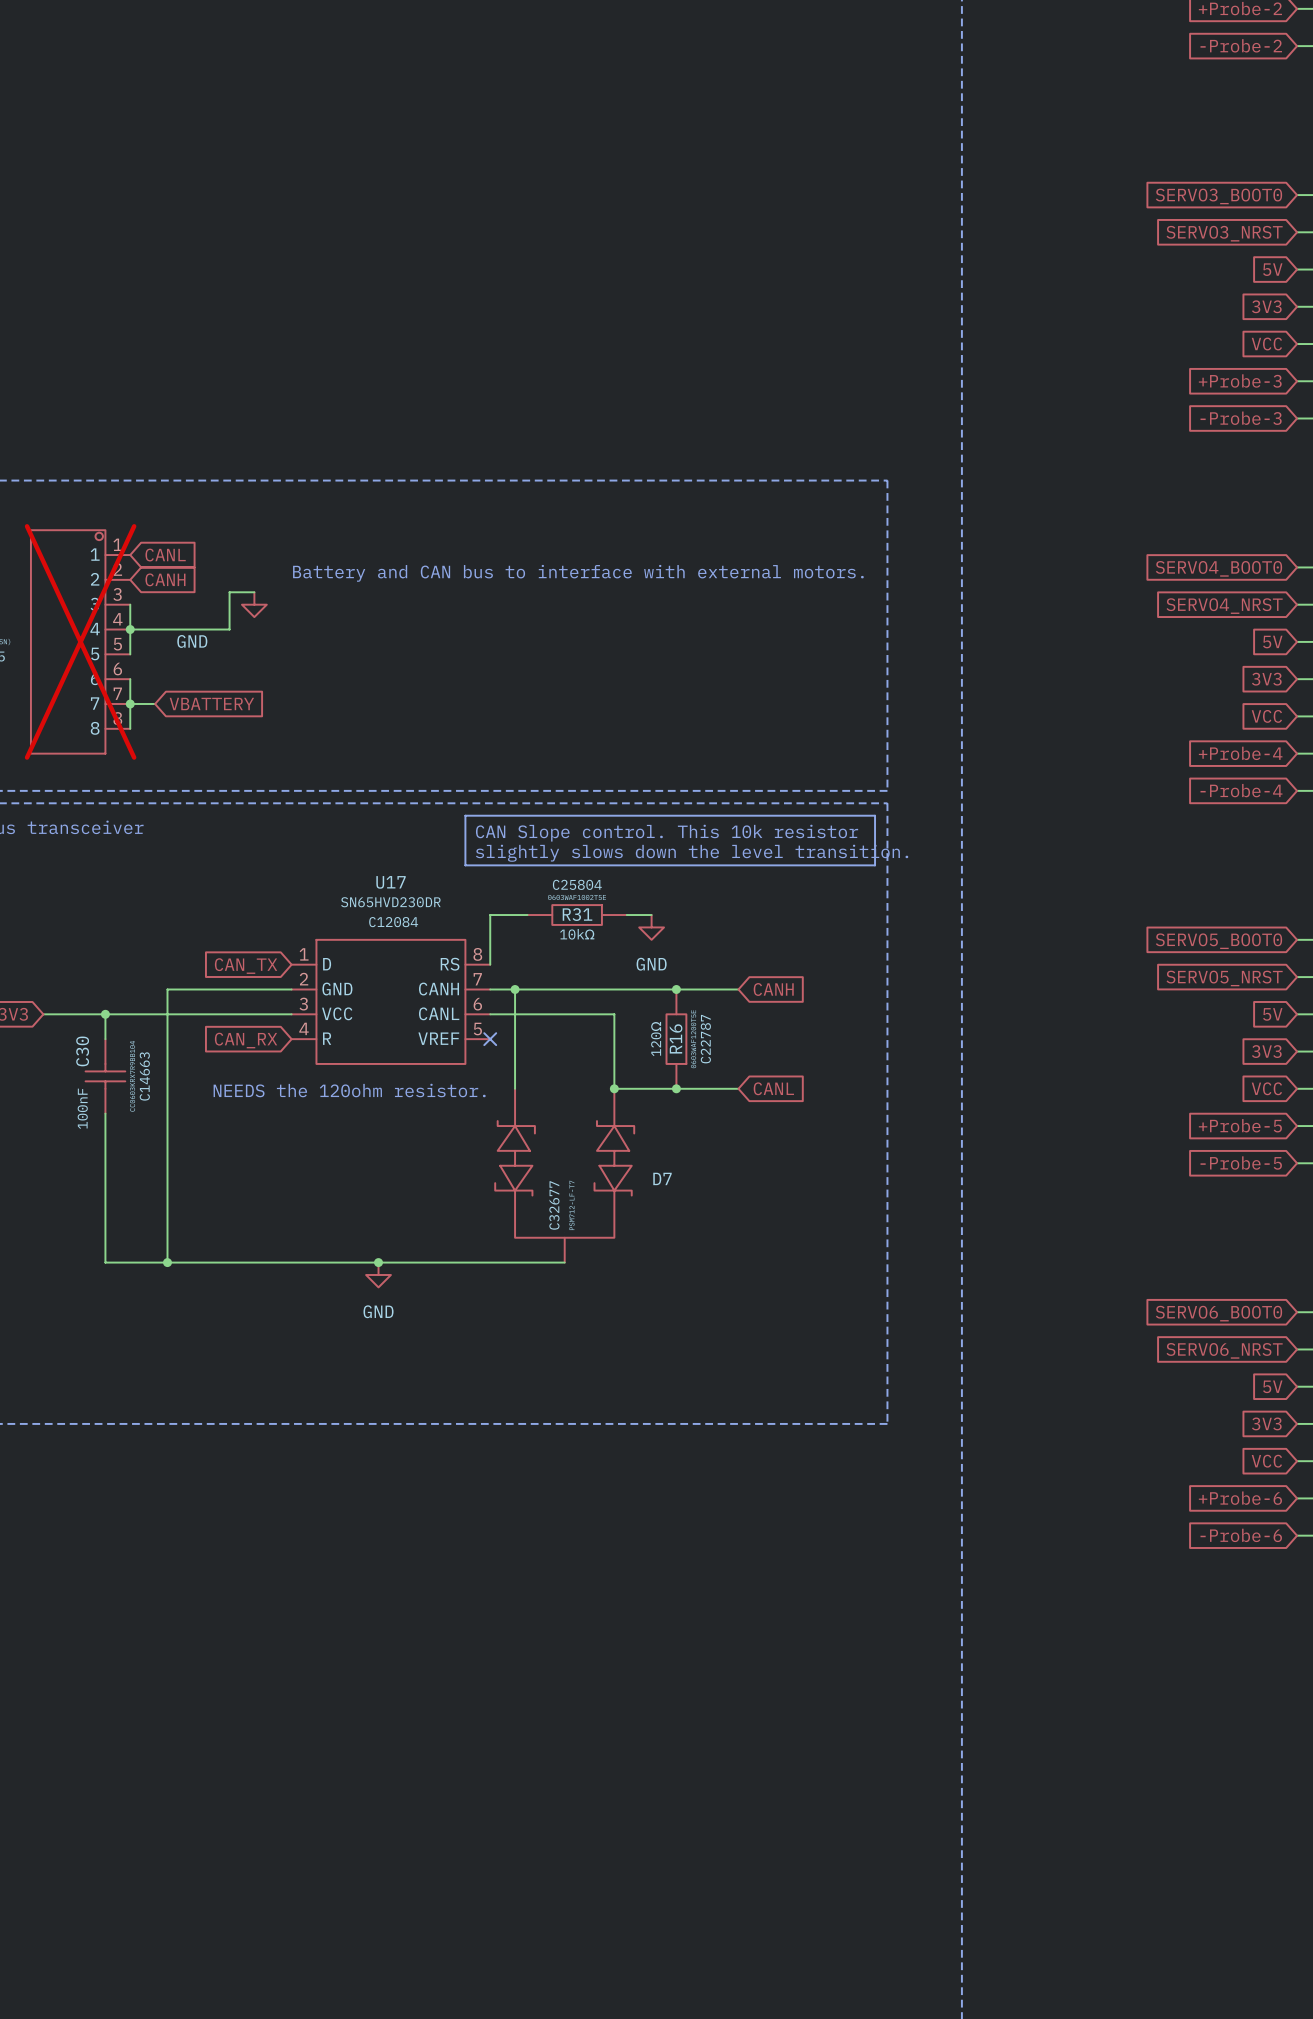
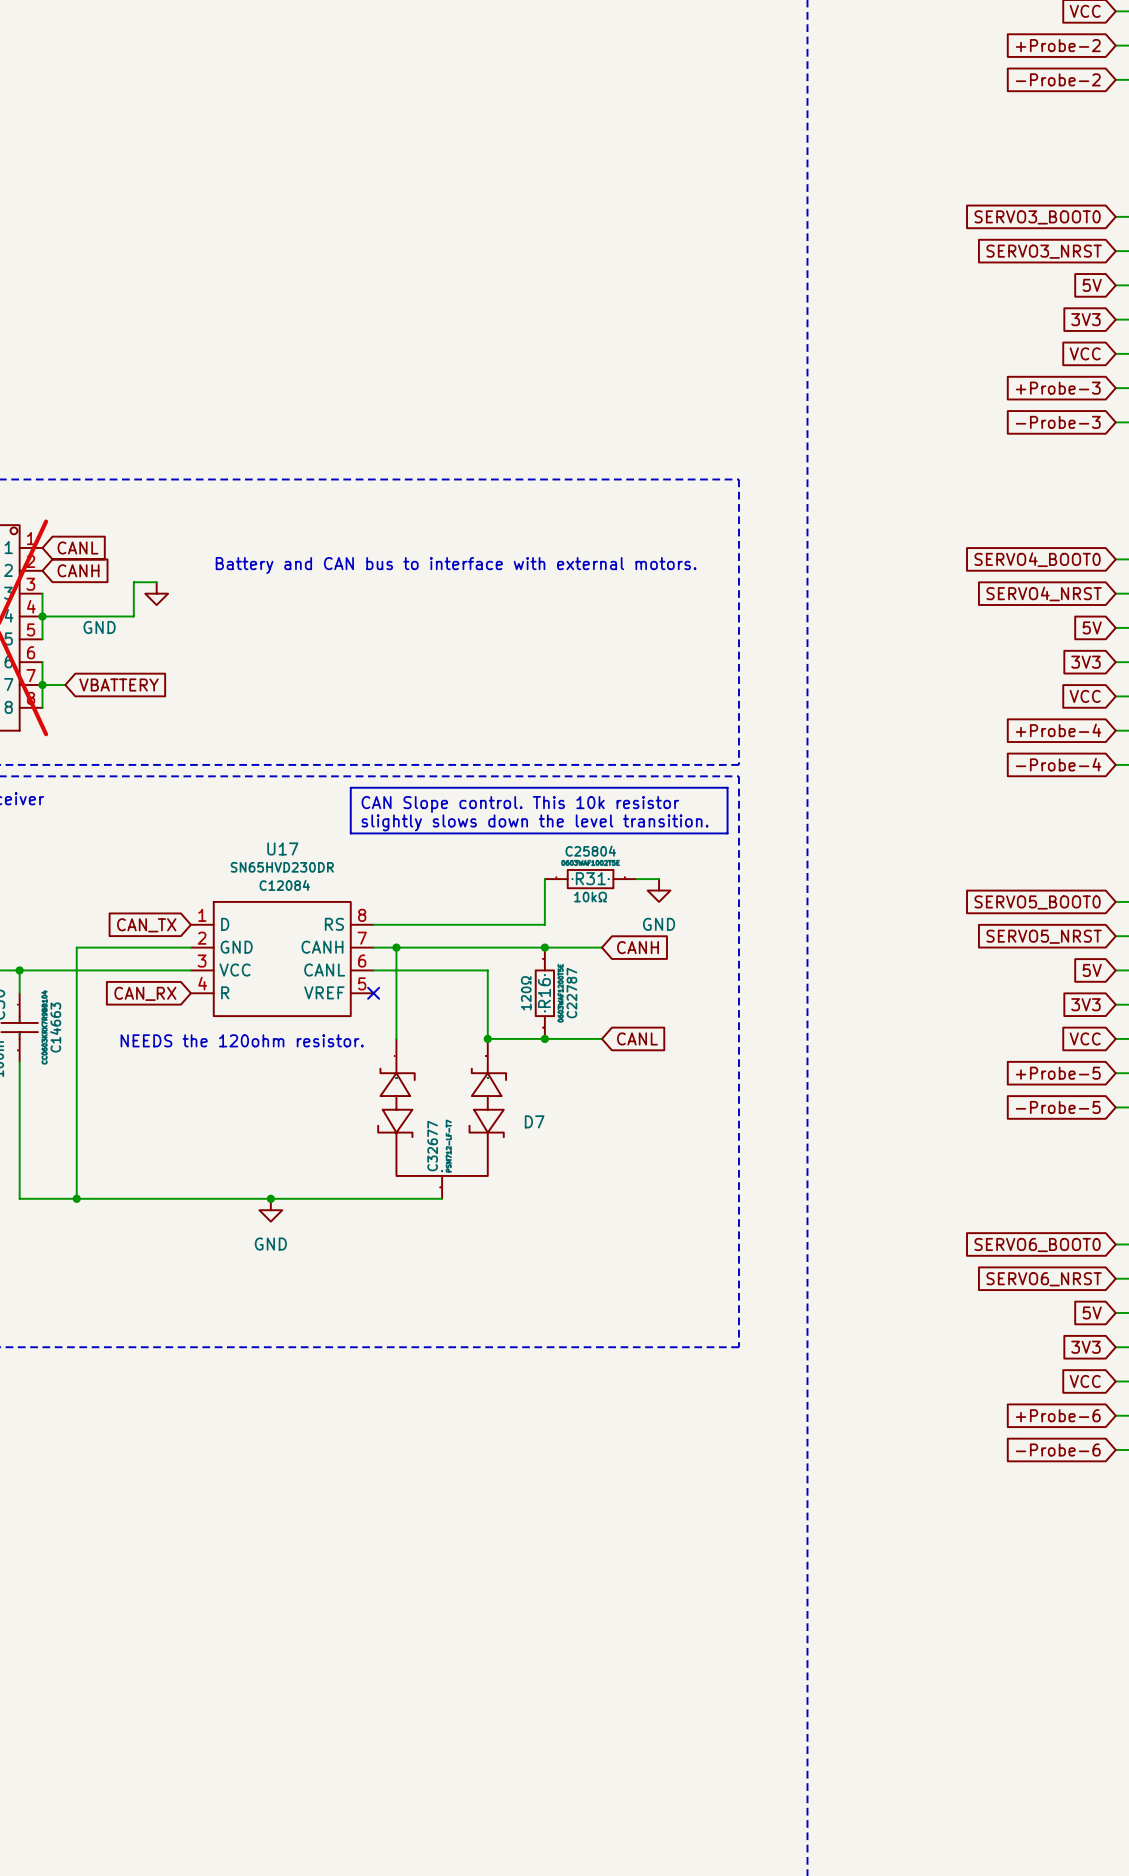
wire: (527, 915) (490, 915) (490, 964) -> (544, 879) (544, 924) (373, 924)
R31 position: (577, 915) -> (590, 879)
wire: (626, 915) (651, 915) -> (636, 879) (659, 879)
power symbol position: GND (651, 927) -> GND (659, 890)

